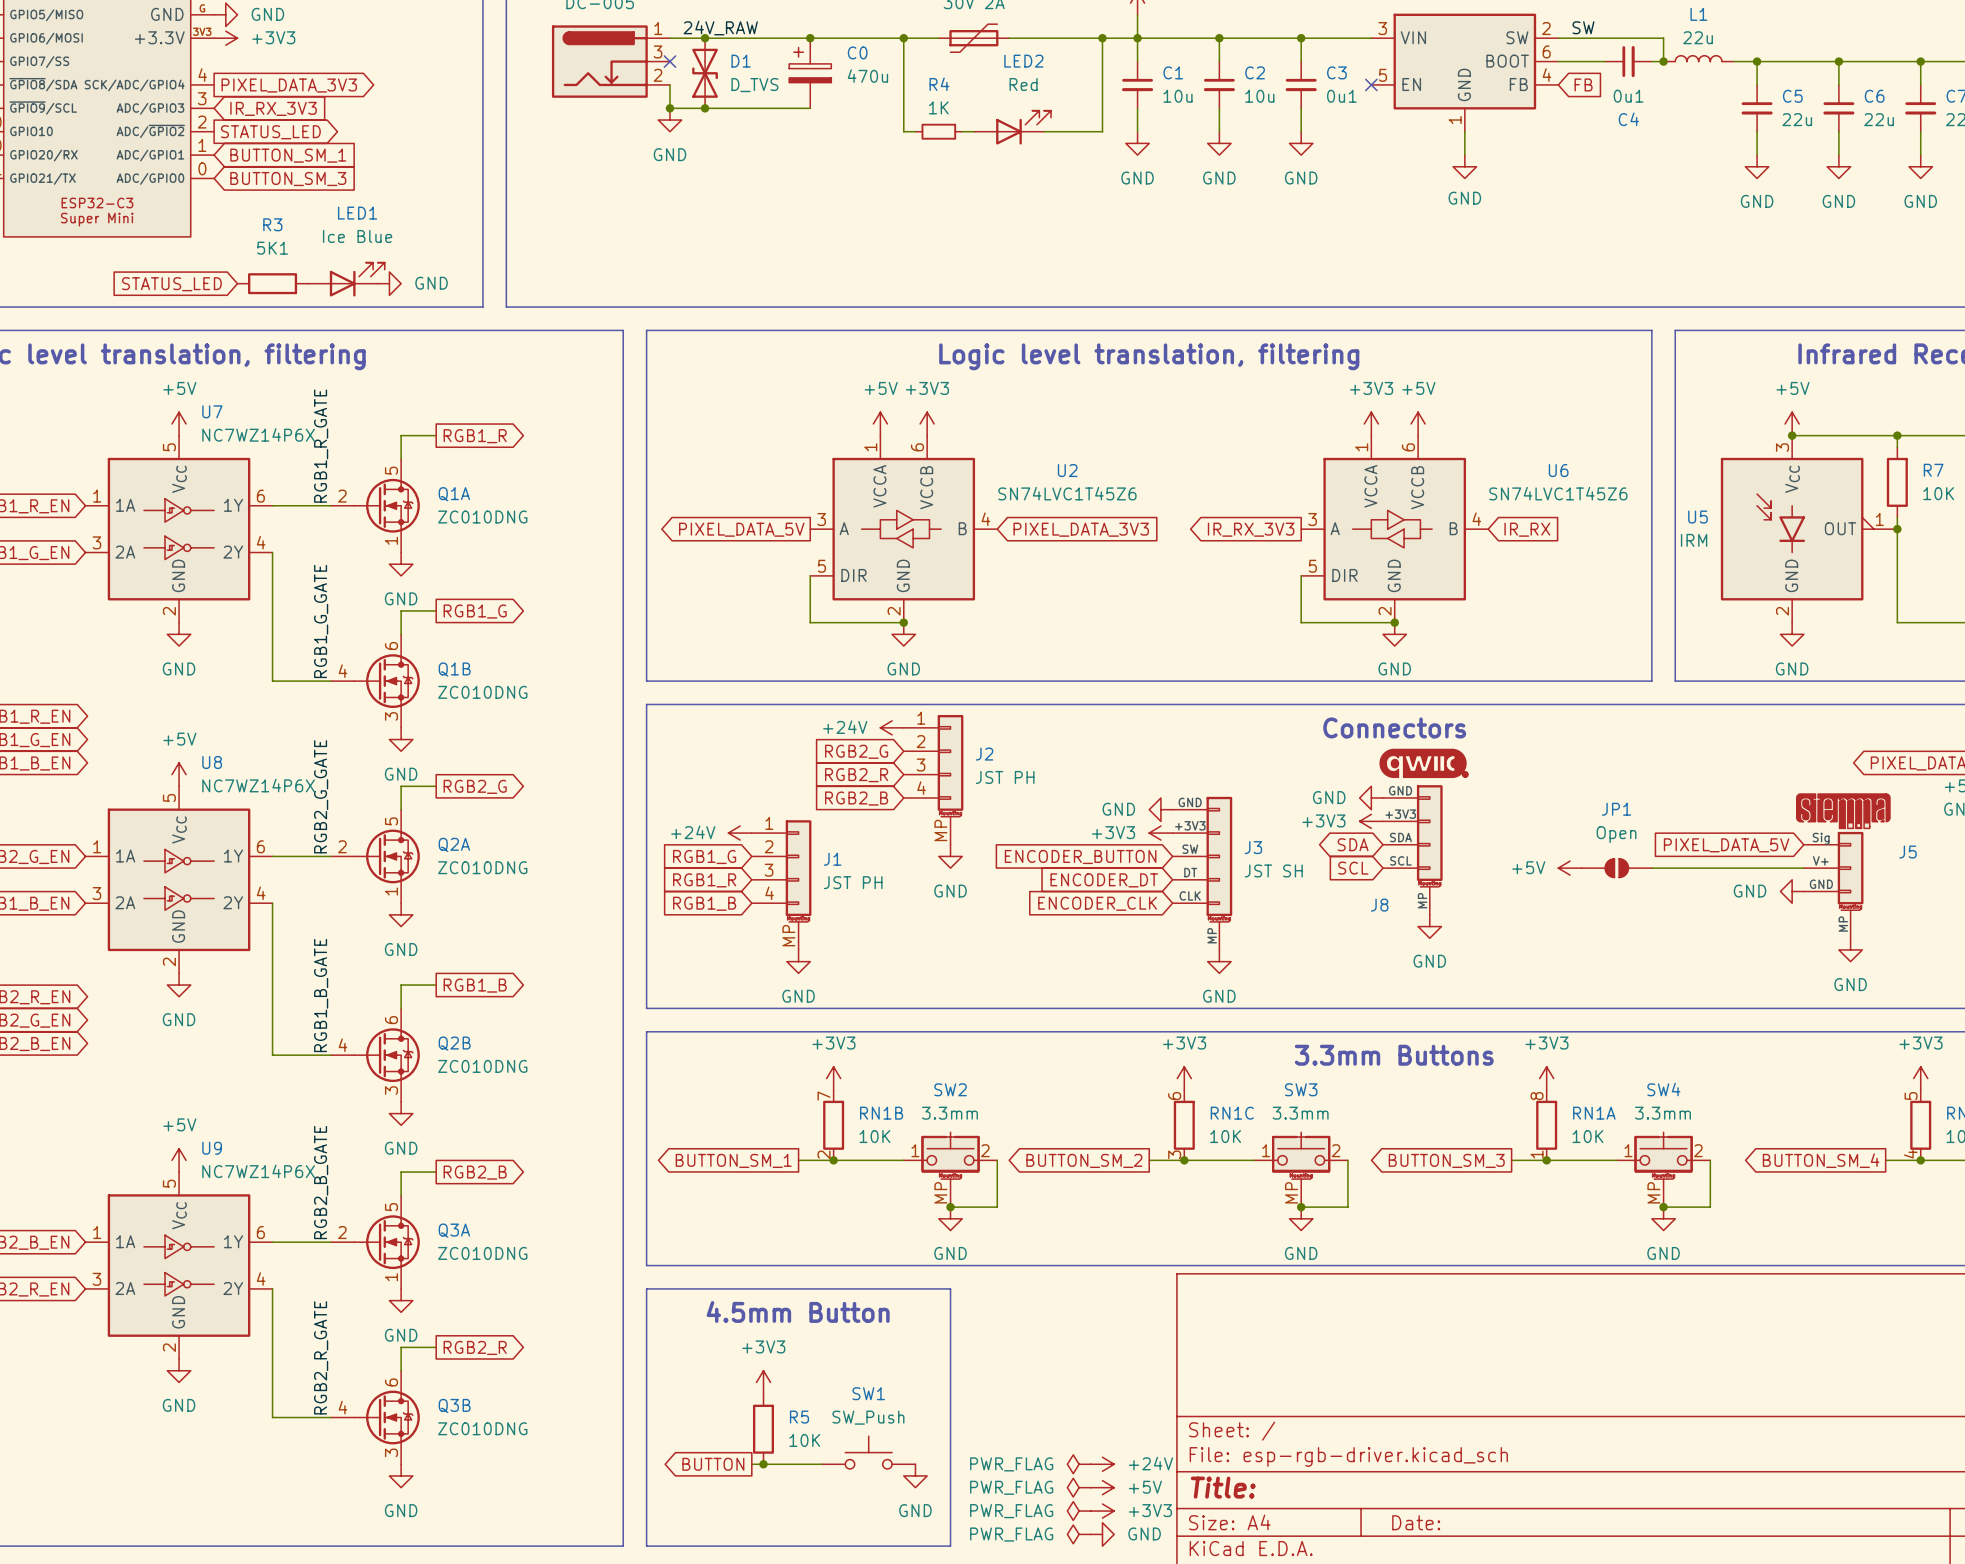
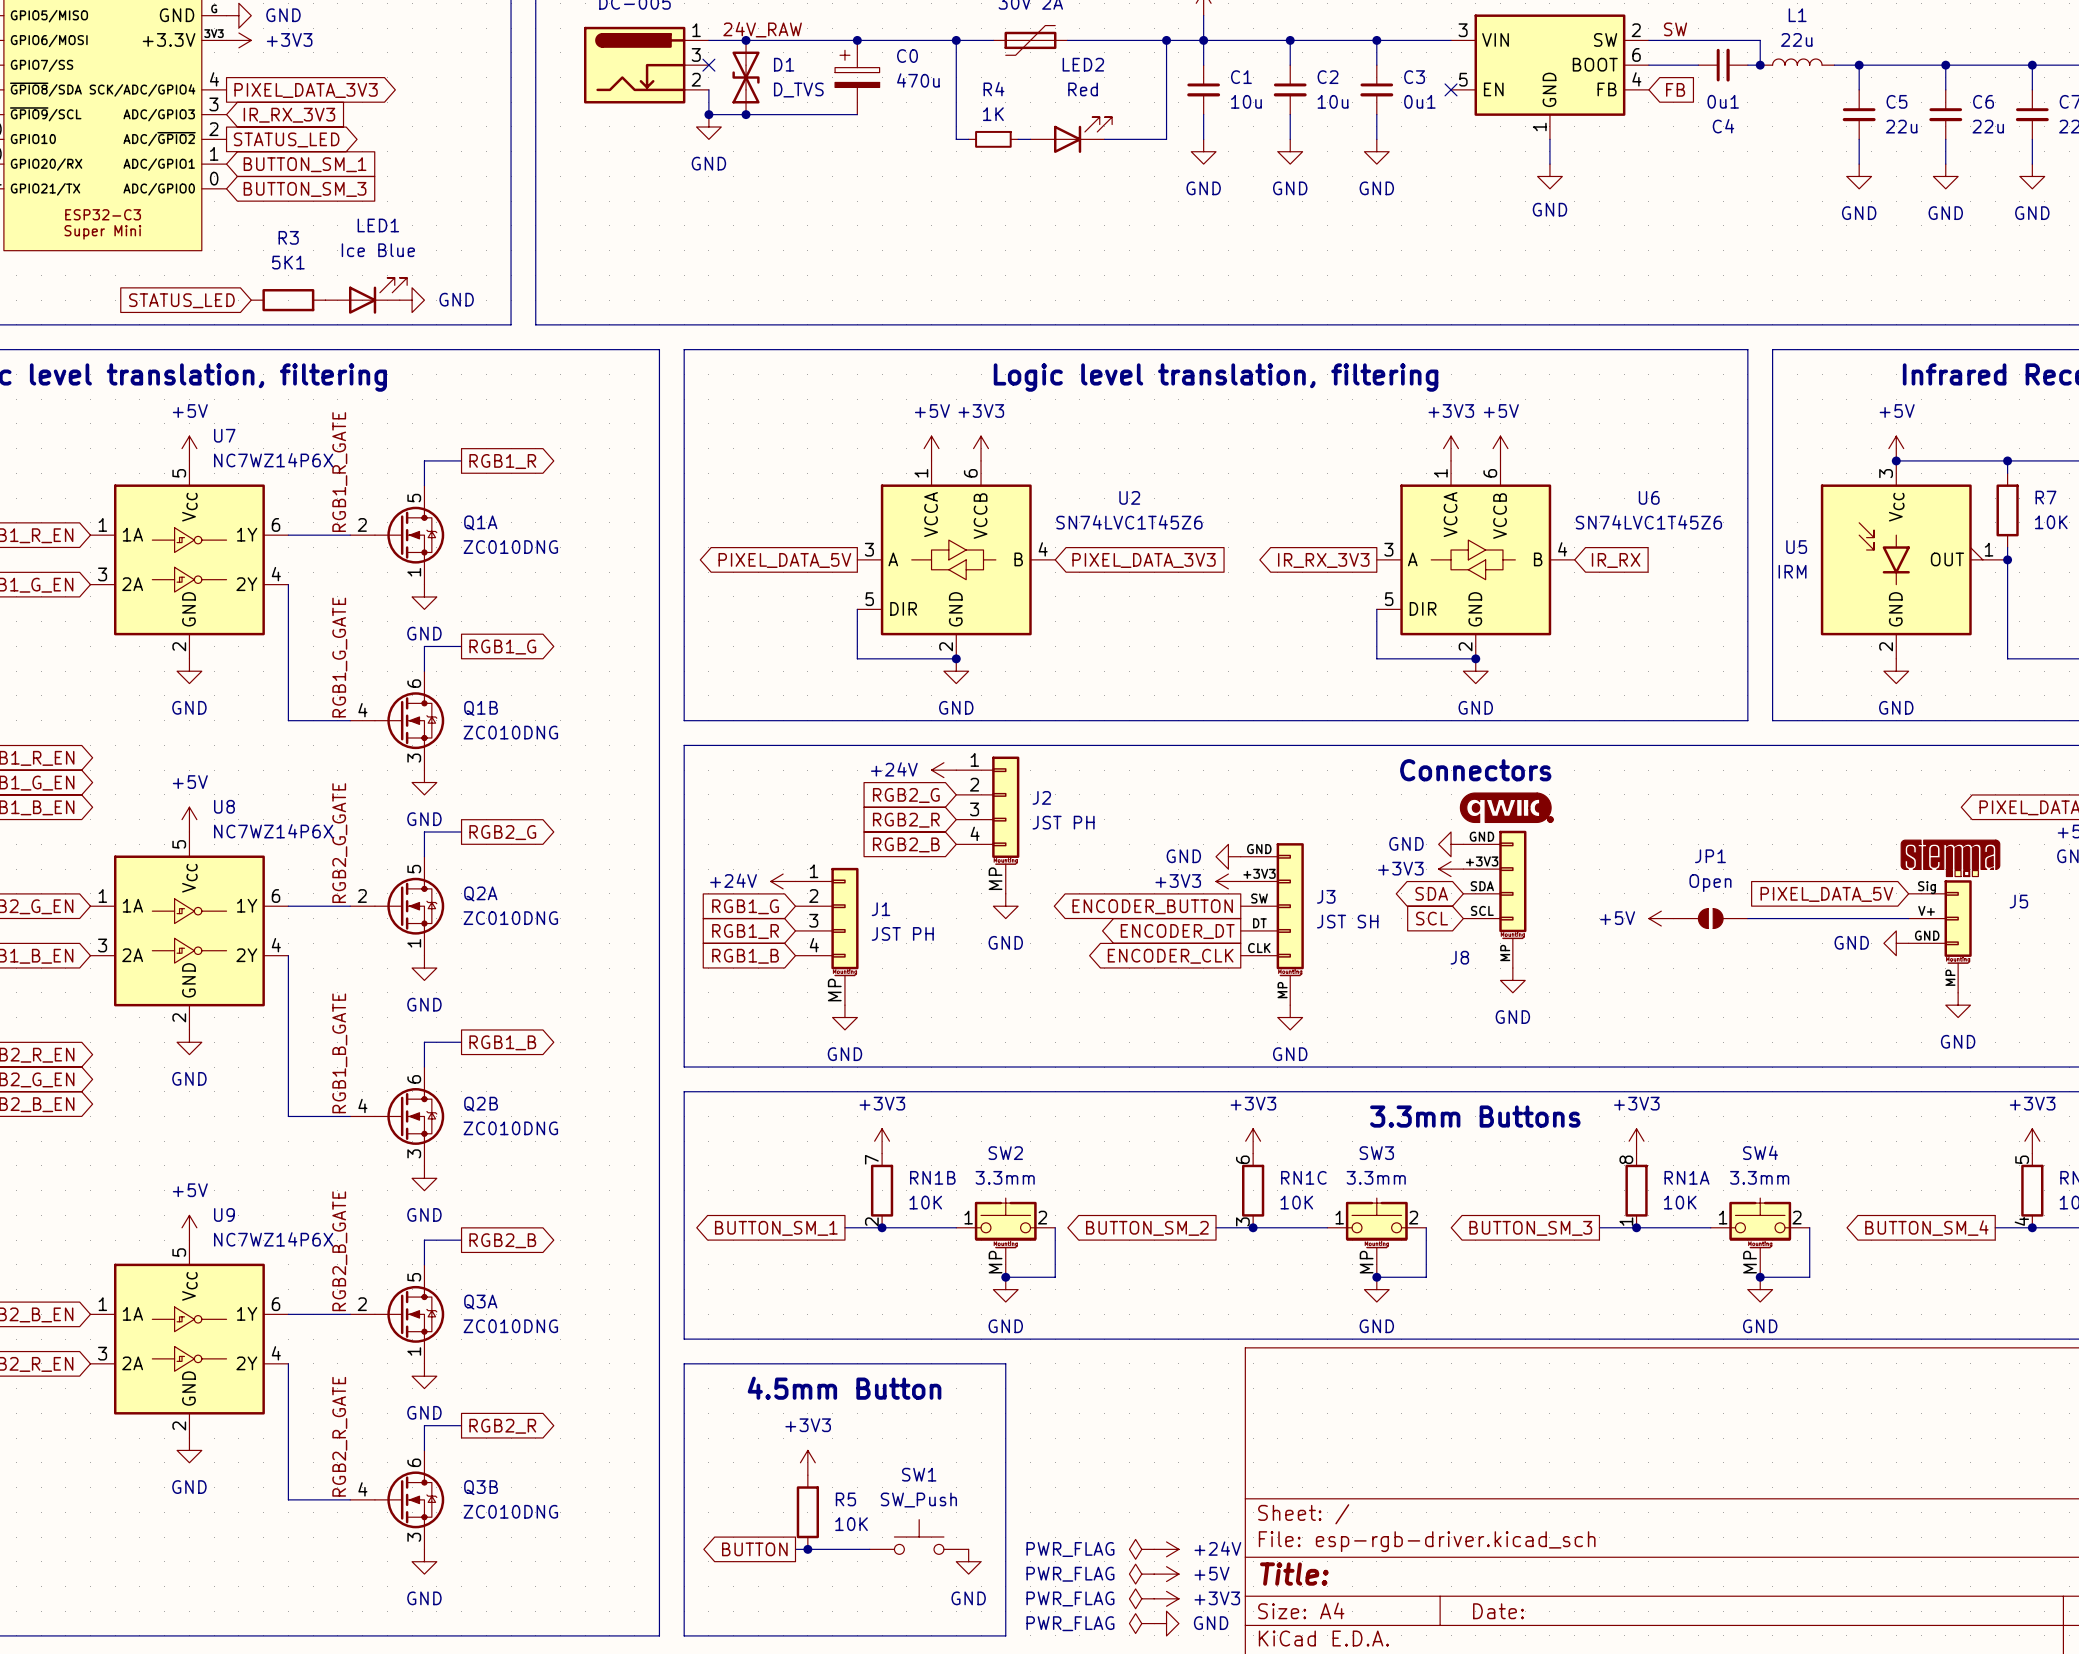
global label shape: input (1080, 857) -> output (1152, 906)
global label shape: input (1104, 880) -> output (1177, 931)
global label shape: input (1097, 903) -> output (1170, 956)

